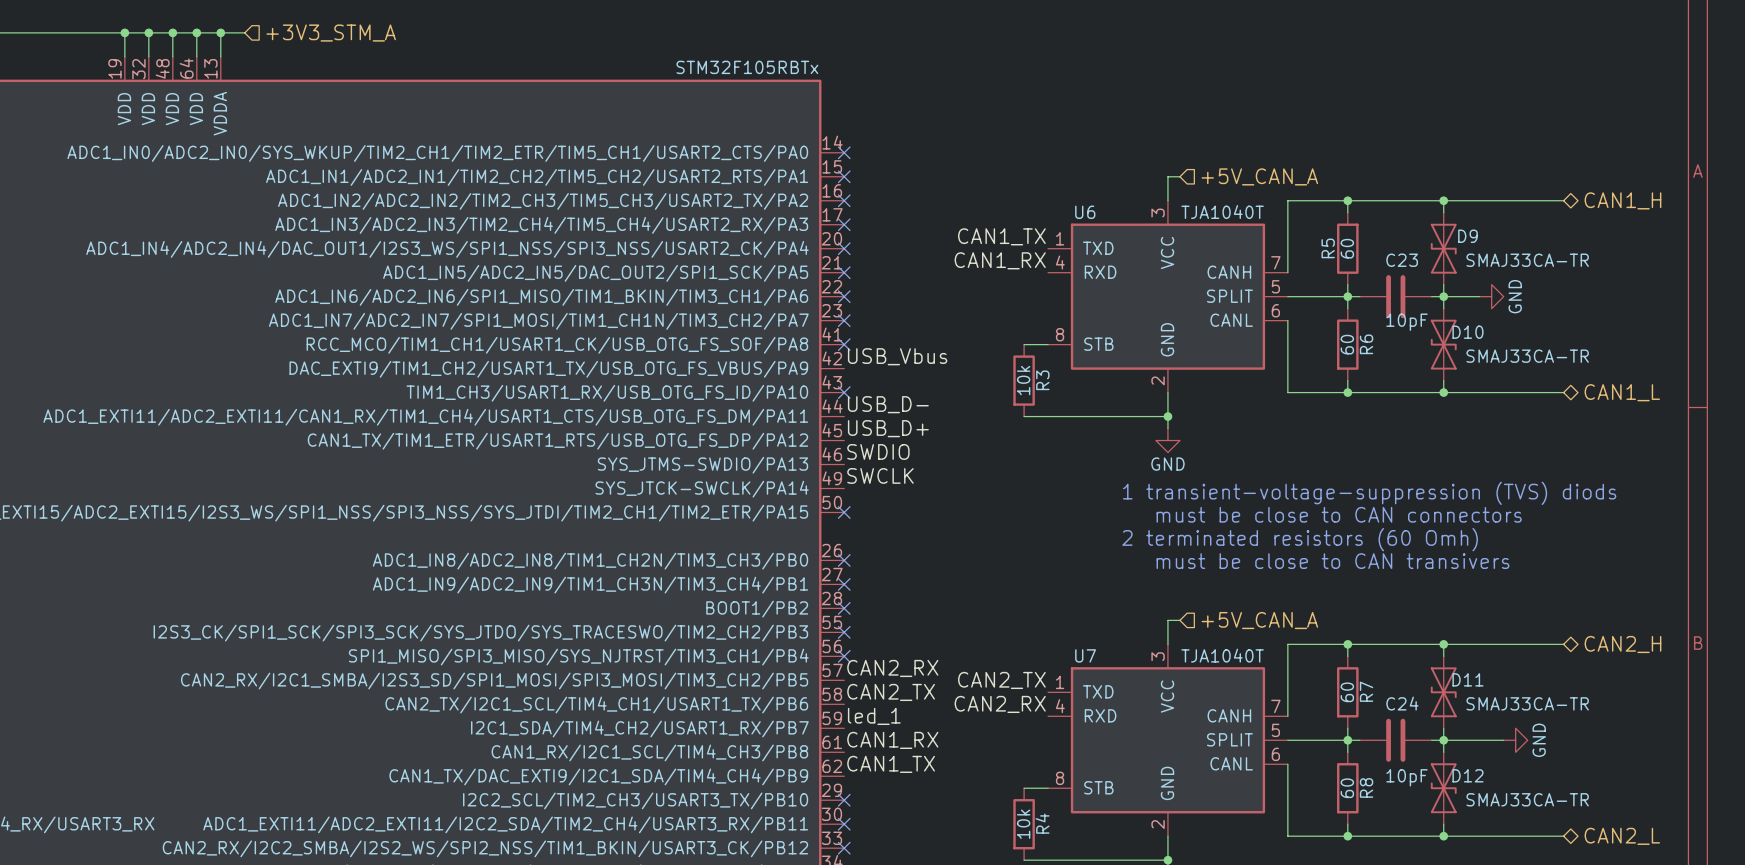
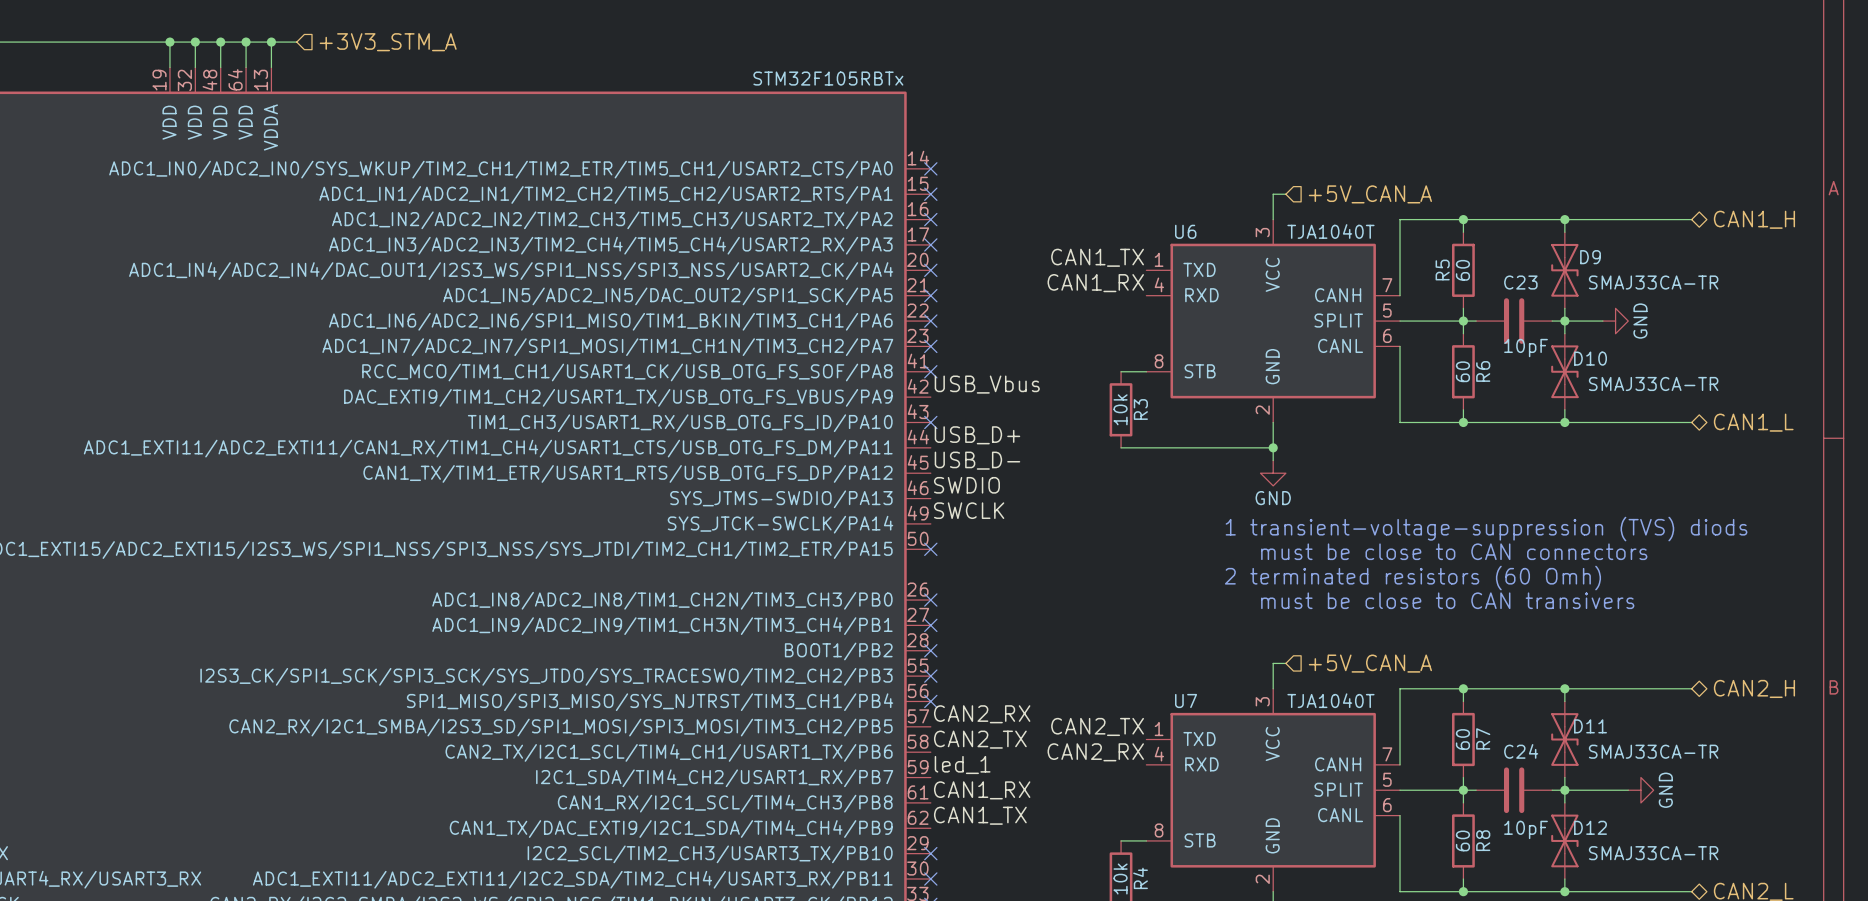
label: USB_D- (888, 404) -> USB_D+ (977, 435)
label: USB_D+ (888, 428) -> USB_D- (977, 460)

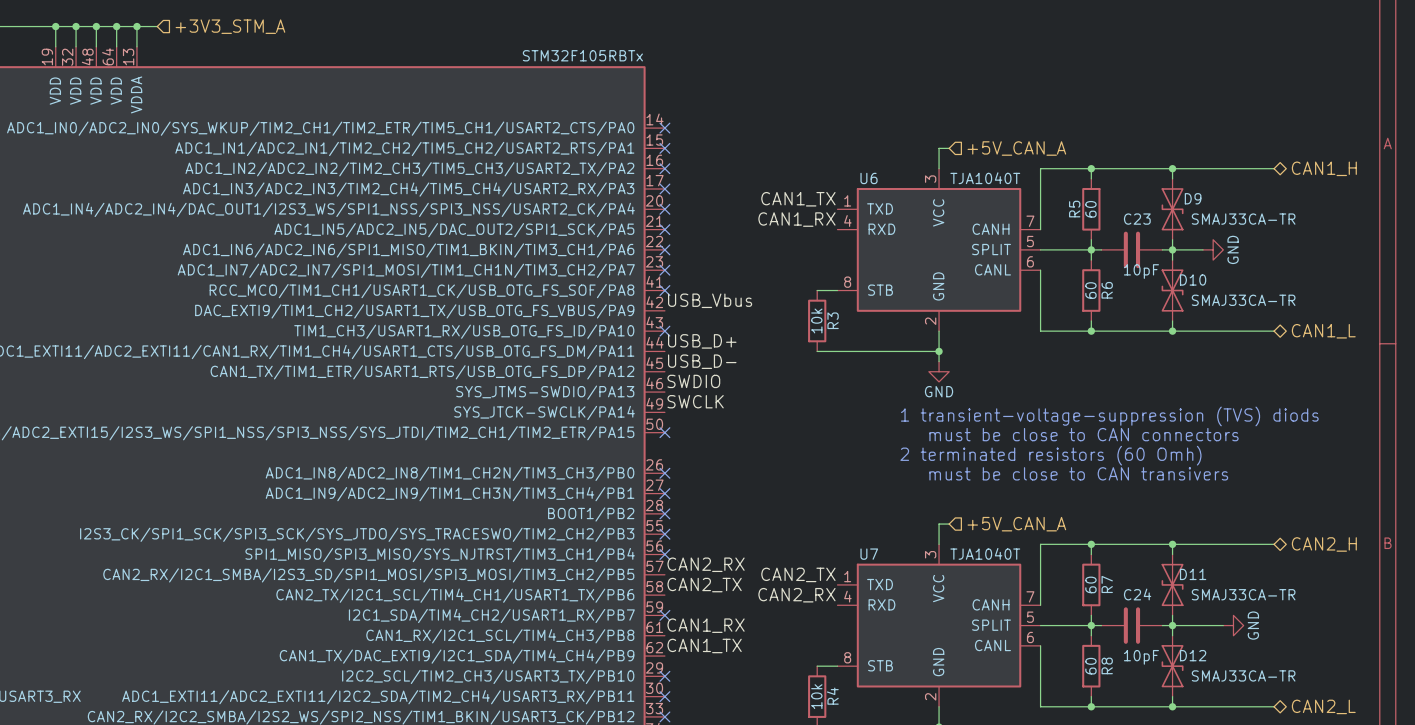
label: led_1 (962, 765) -> none
no-connect mark: none -> (664, 615)

